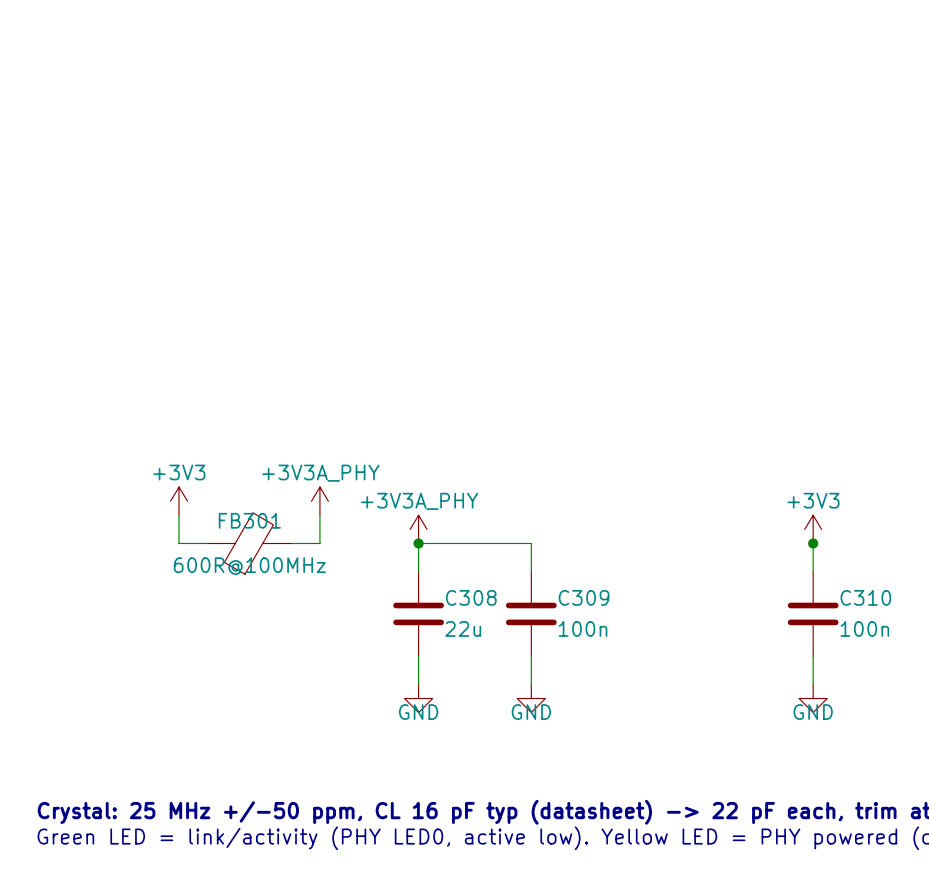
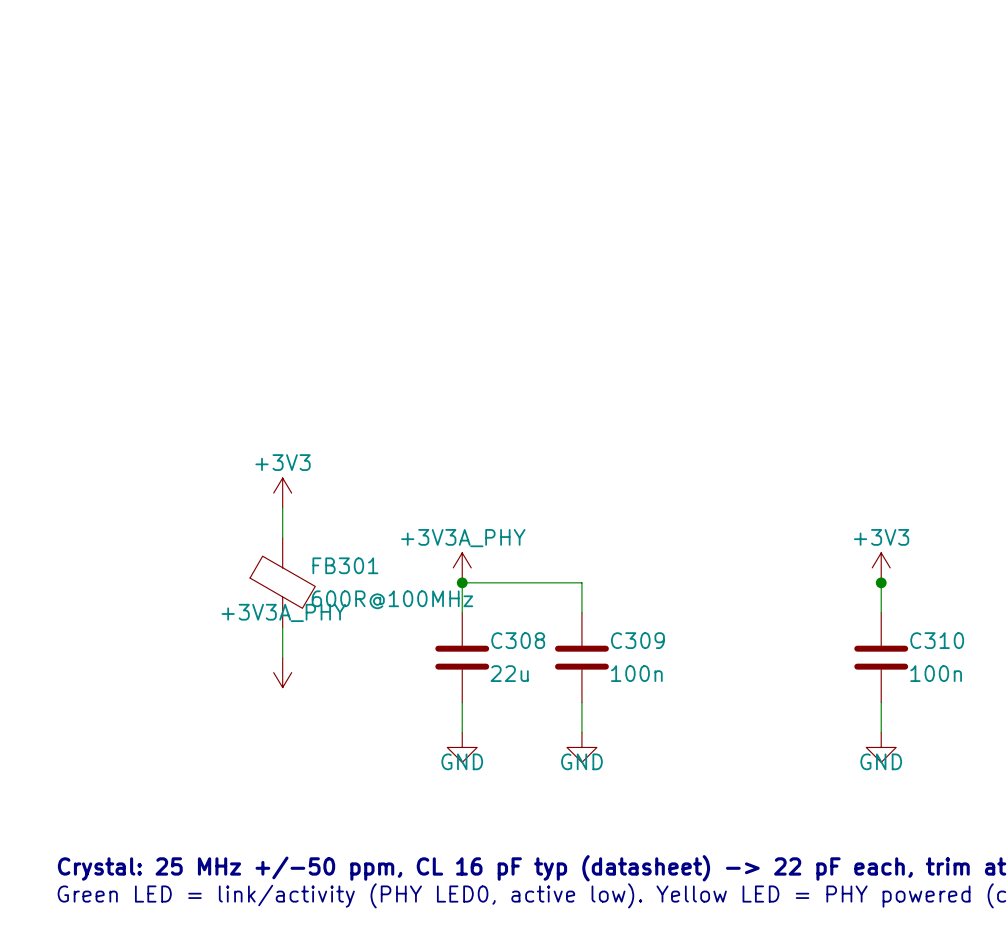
wire: none -> (282, 508) (282, 537)
power symbol text position: +3V3A_PHY (320, 473) -> +3V3A_PHY (283, 612)
power symbol position: +3V3 (179, 501) -> +3V3 (282, 493)
power symbol rotation: 0° (319, 501) -> 180° (282, 672)
power symbol position: +3V3A_PHY (319, 501) -> +3V3A_PHY (282, 672)
wire: (179, 515) (179, 543) (207, 543) -> none
wire: (319, 515) (319, 543) (291, 543) -> none
FB301 name position: FB301 (249, 520) -> FB301 (345, 565)
FB301 rotation: 0° (248, 543) -> 90° clockwise (282, 582)
FB301 value position: 600R@100MHz (249, 566) -> 600R@100MHz (392, 599)
wire: none -> (282, 627) (282, 657)

